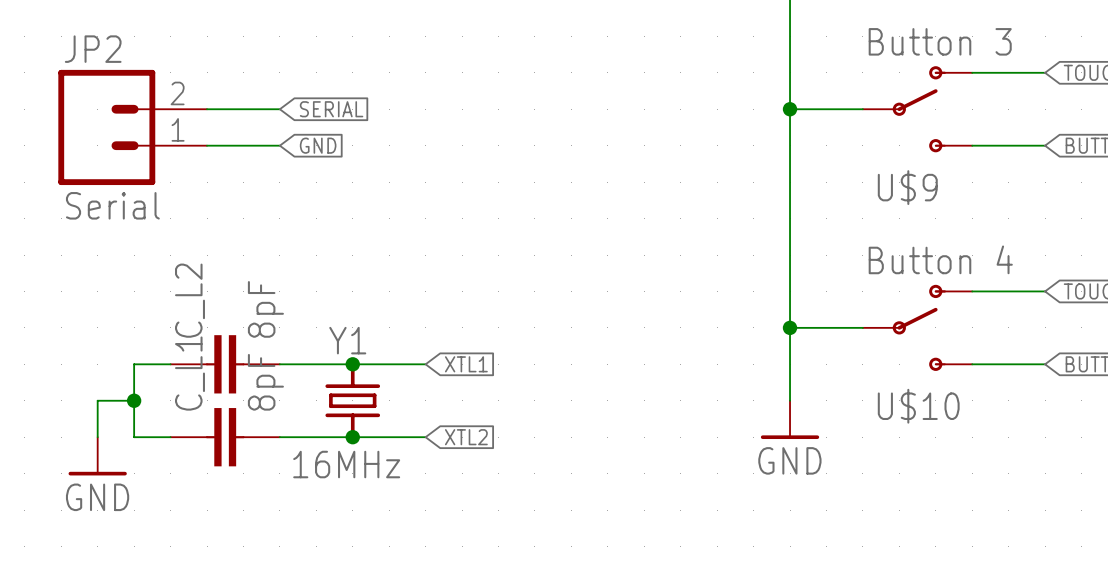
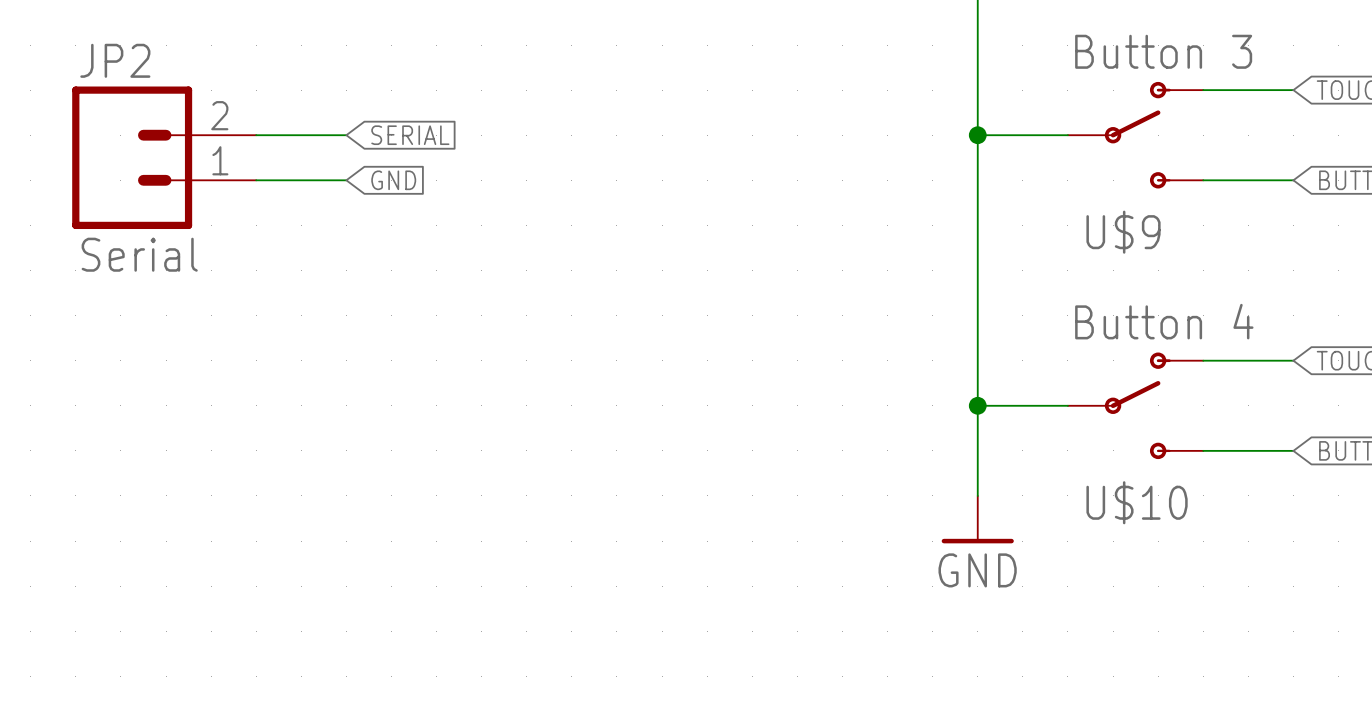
wire: (170, 364) (134, 364) (134, 437) (170, 437) -> none
C_L2: 8pF (225, 364) -> none
wire: (279, 364) (425, 364) -> none
junction: (352, 364) -> none
global label: XTL1 (466, 364) -> none
wire: (134, 400) (97, 400) (97, 437) -> none
junction: (134, 400) -> none
Y1: 16MHz (352, 400) -> none
C_L1: 8pF (225, 437) -> none
wire: (279, 437) (425, 437) -> none
junction: (352, 437) -> none
global label: XTL2 (466, 437) -> none
power symbol: GND (97, 456) -> none

